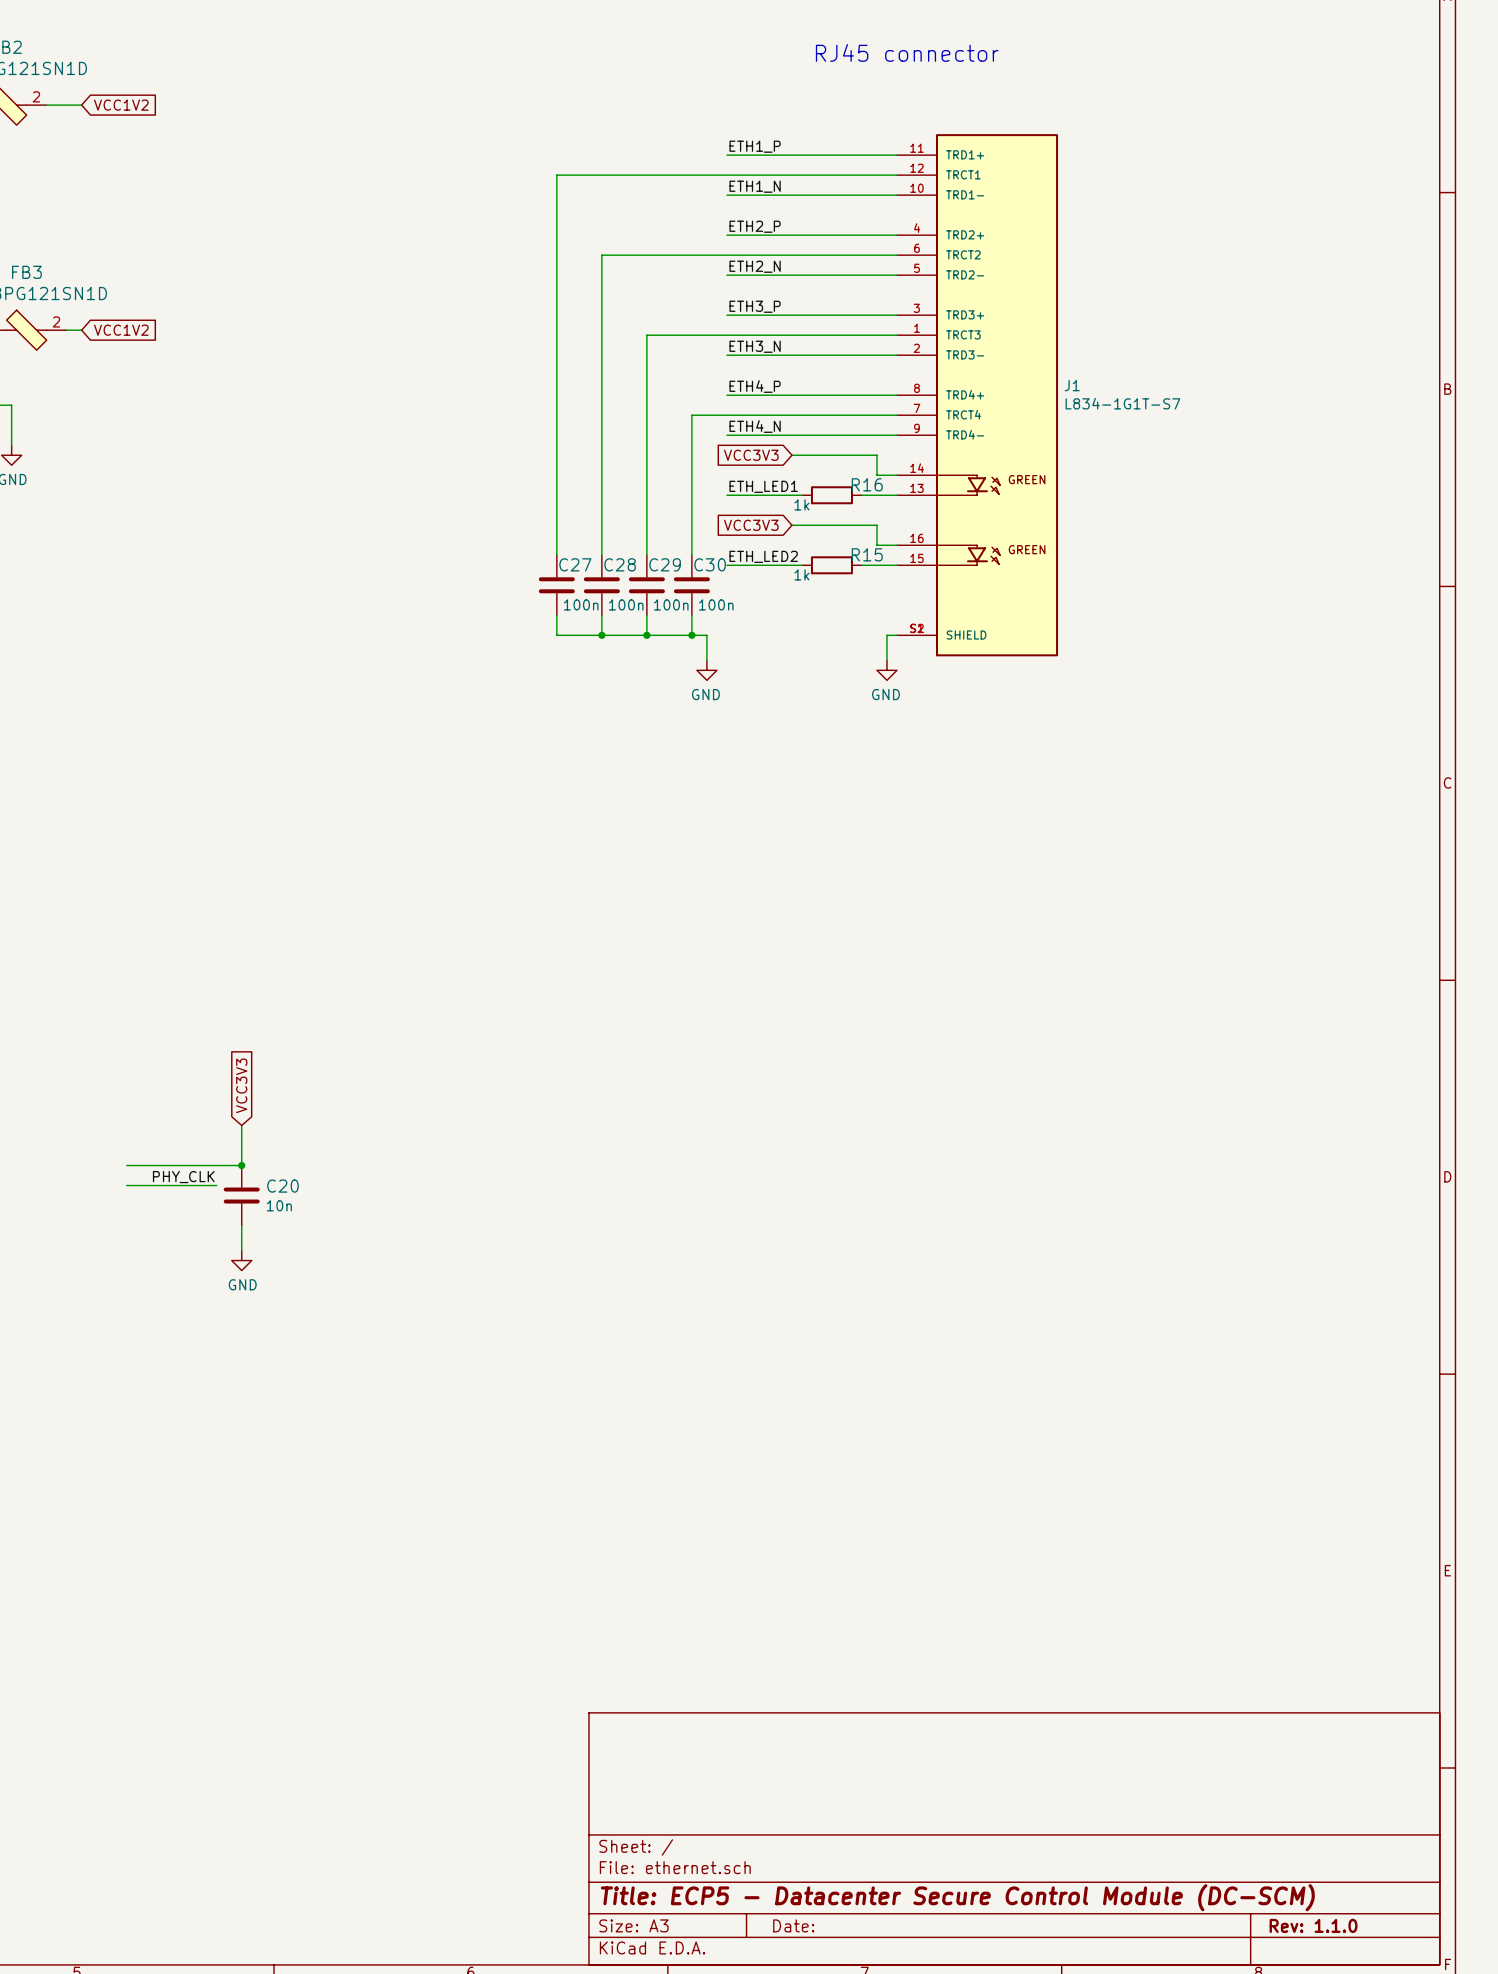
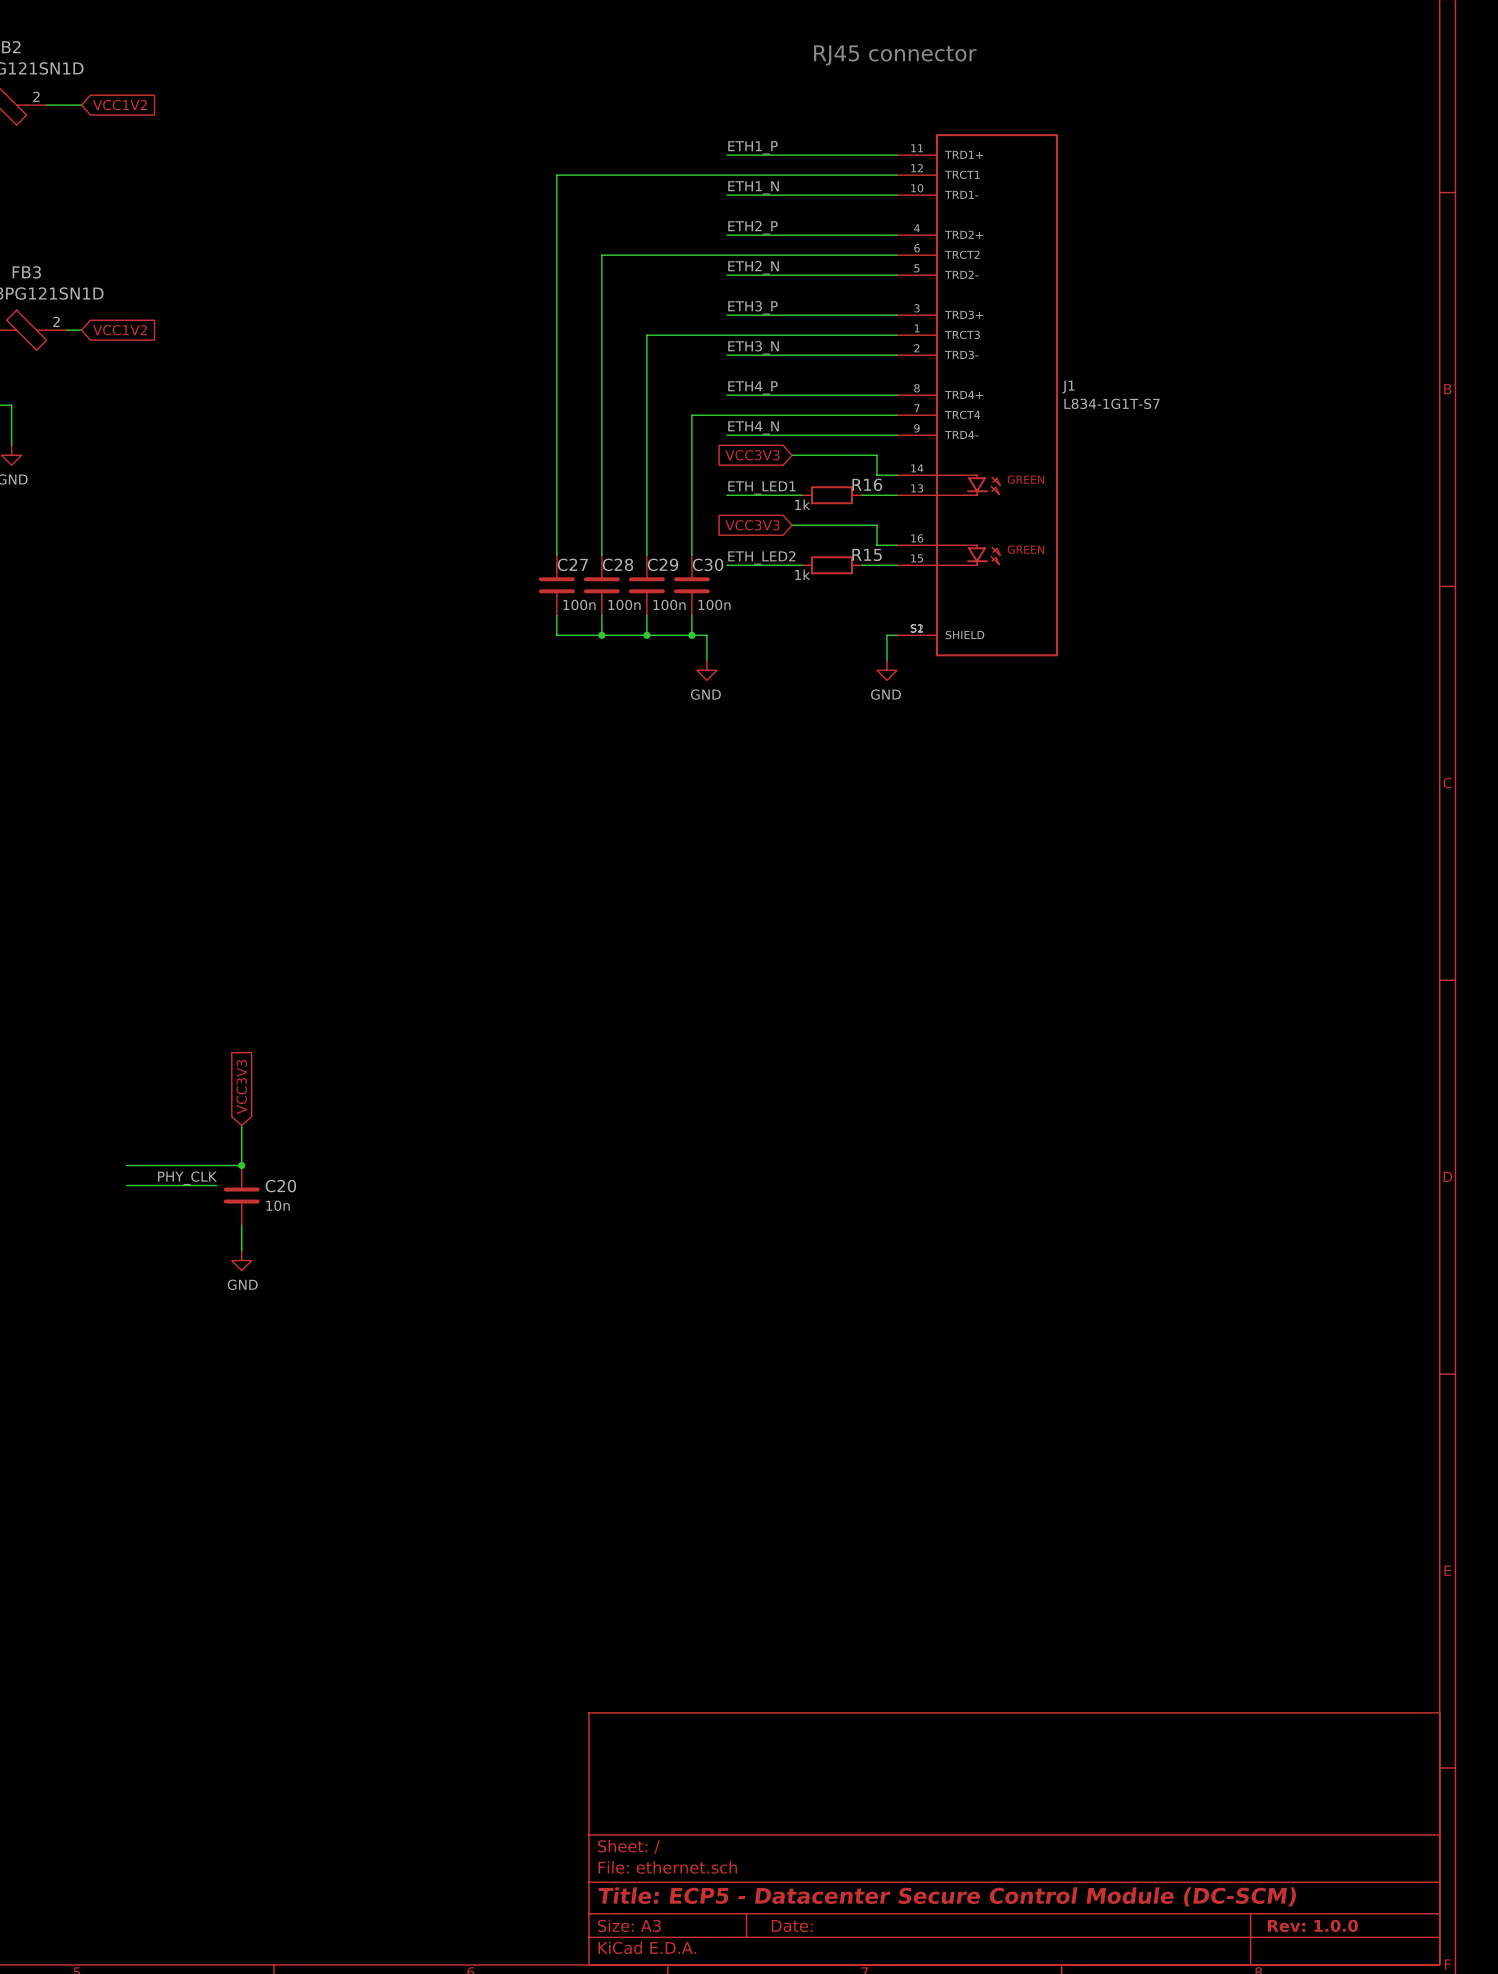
title block: Rev: 1.1.0 (1313, 1925) -> Rev: 1.0.0 (1312, 1925)

